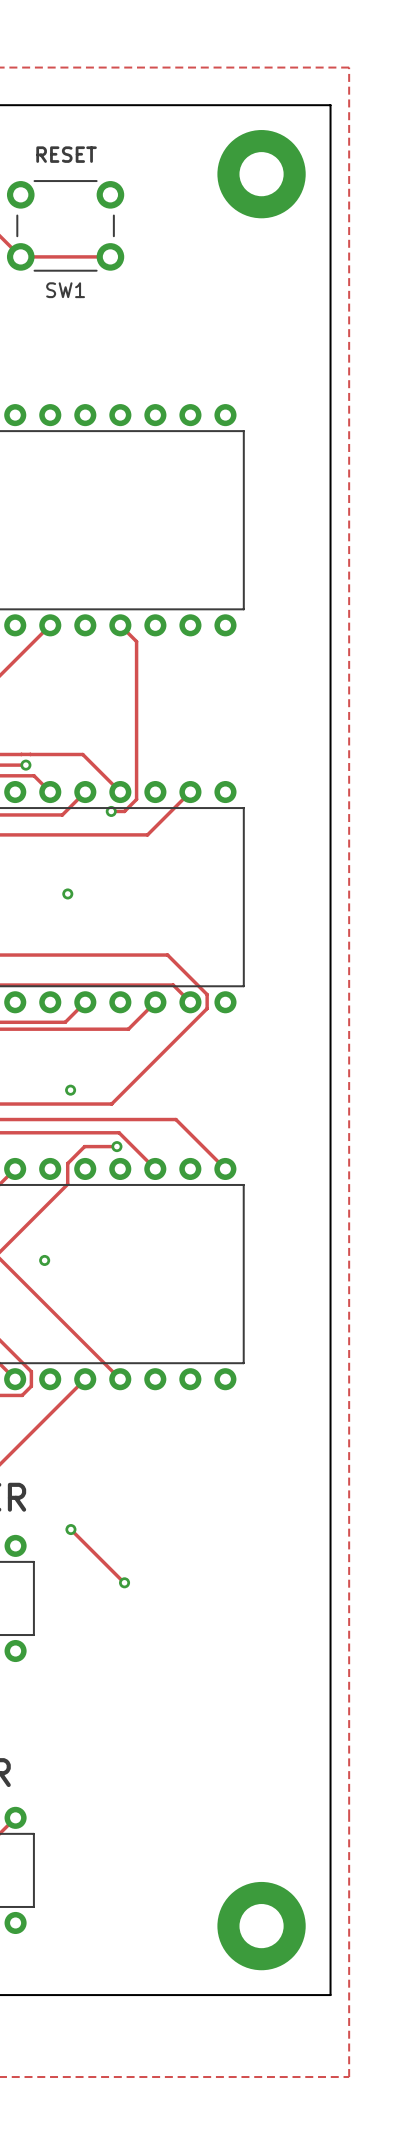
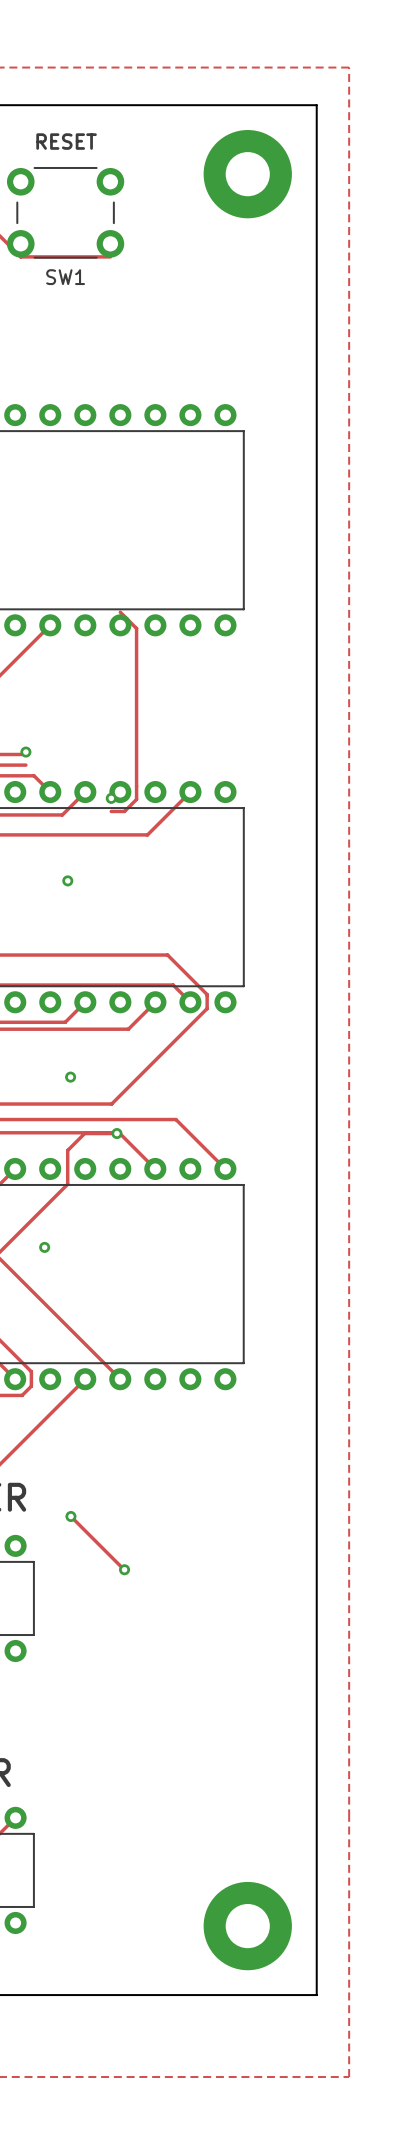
board edge: (316, 105) (330, 105) (330, 1995) (316, 1995) -> (316, 105) (316, 1995)
text position: RESET (66, 154) -> RESET (66, 141)
part position: (261, 174) -> (247, 174)
SW1 position: (65, 225) -> (65, 212)
track: (120, 625) (136, 641) -> (120, 612) (136, 628) (136, 641)
track: (21, 754) (30, 754) -> none
track: (30, 754) (82, 754) (120, 792) -> none
via position: (25, 765) -> (25, 752)
via position: (111, 811) -> (111, 798)
via position: (67, 893) -> (67, 880)
via position: (70, 1090) -> (70, 1077)
track: (116, 1146) (84, 1146) (67, 1163) -> (116, 1133) (84, 1133) (67, 1150) (67, 1163)
via position: (116, 1146) -> (116, 1133)
via position: (44, 1260) -> (44, 1247)
track: (70, 1529) (124, 1582) -> (70, 1516) (124, 1569)
via position: (70, 1529) -> (70, 1516)
via position: (124, 1582) -> (124, 1569)
part position: (261, 1926) -> (247, 1926)

